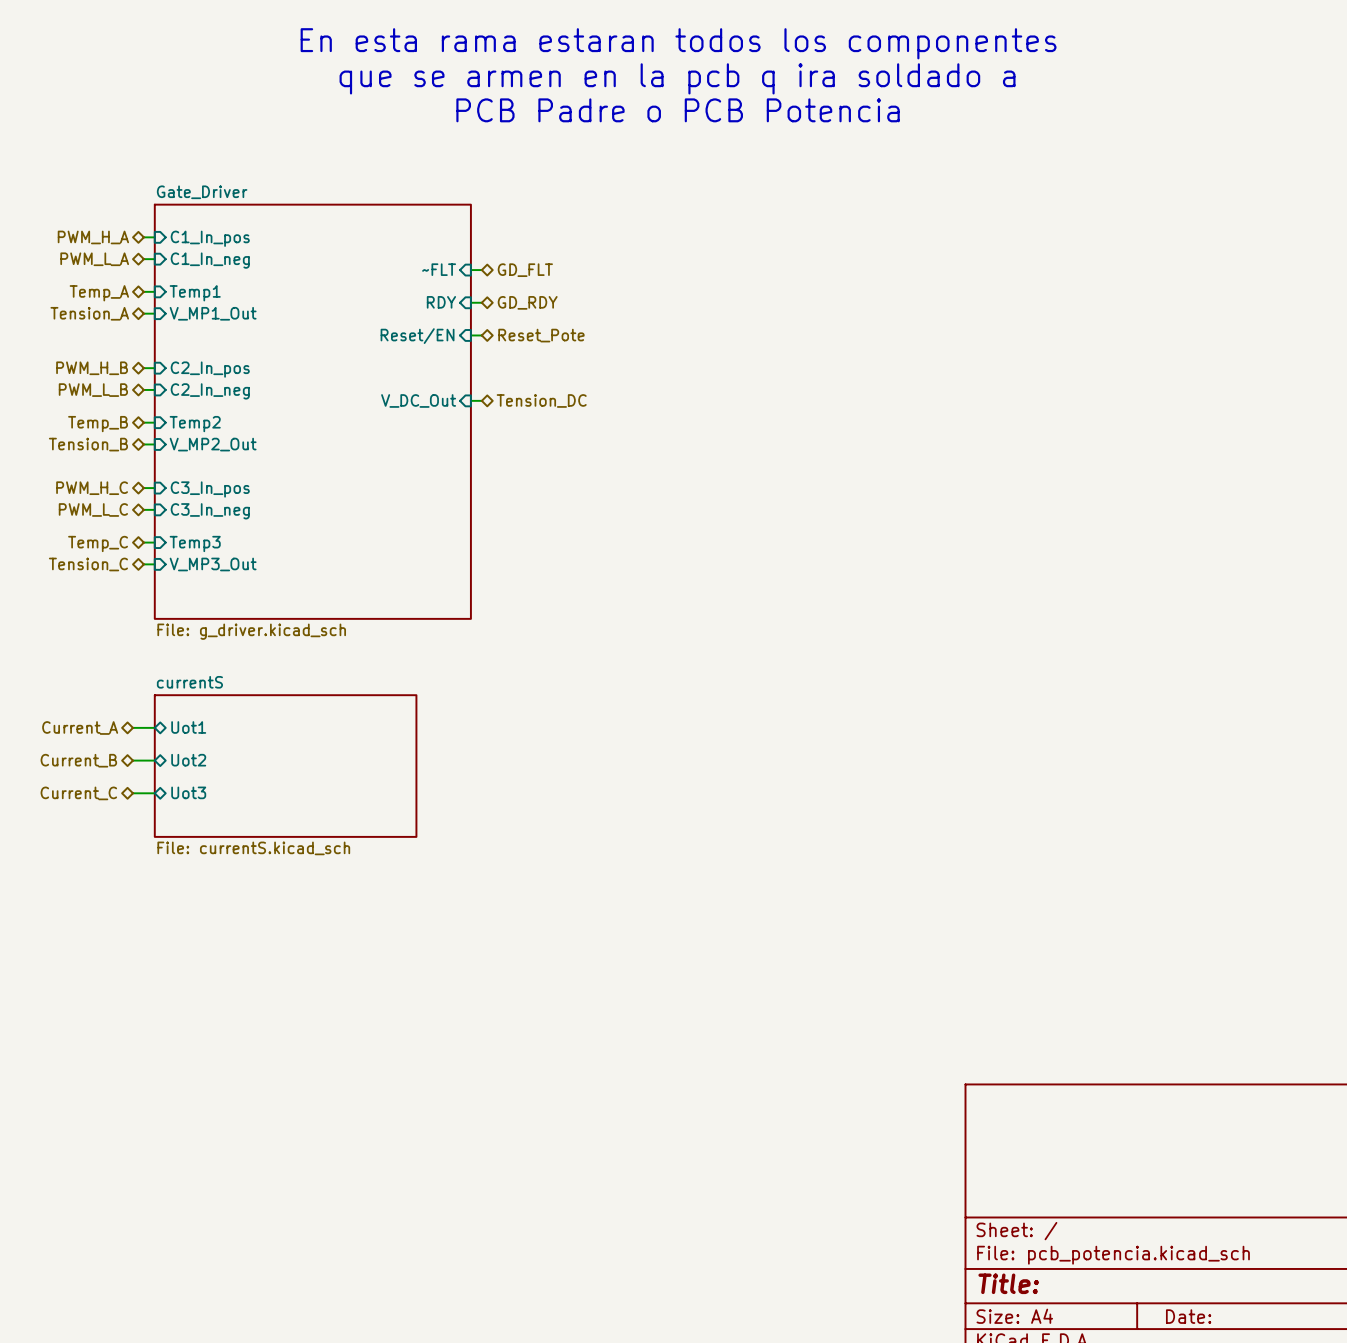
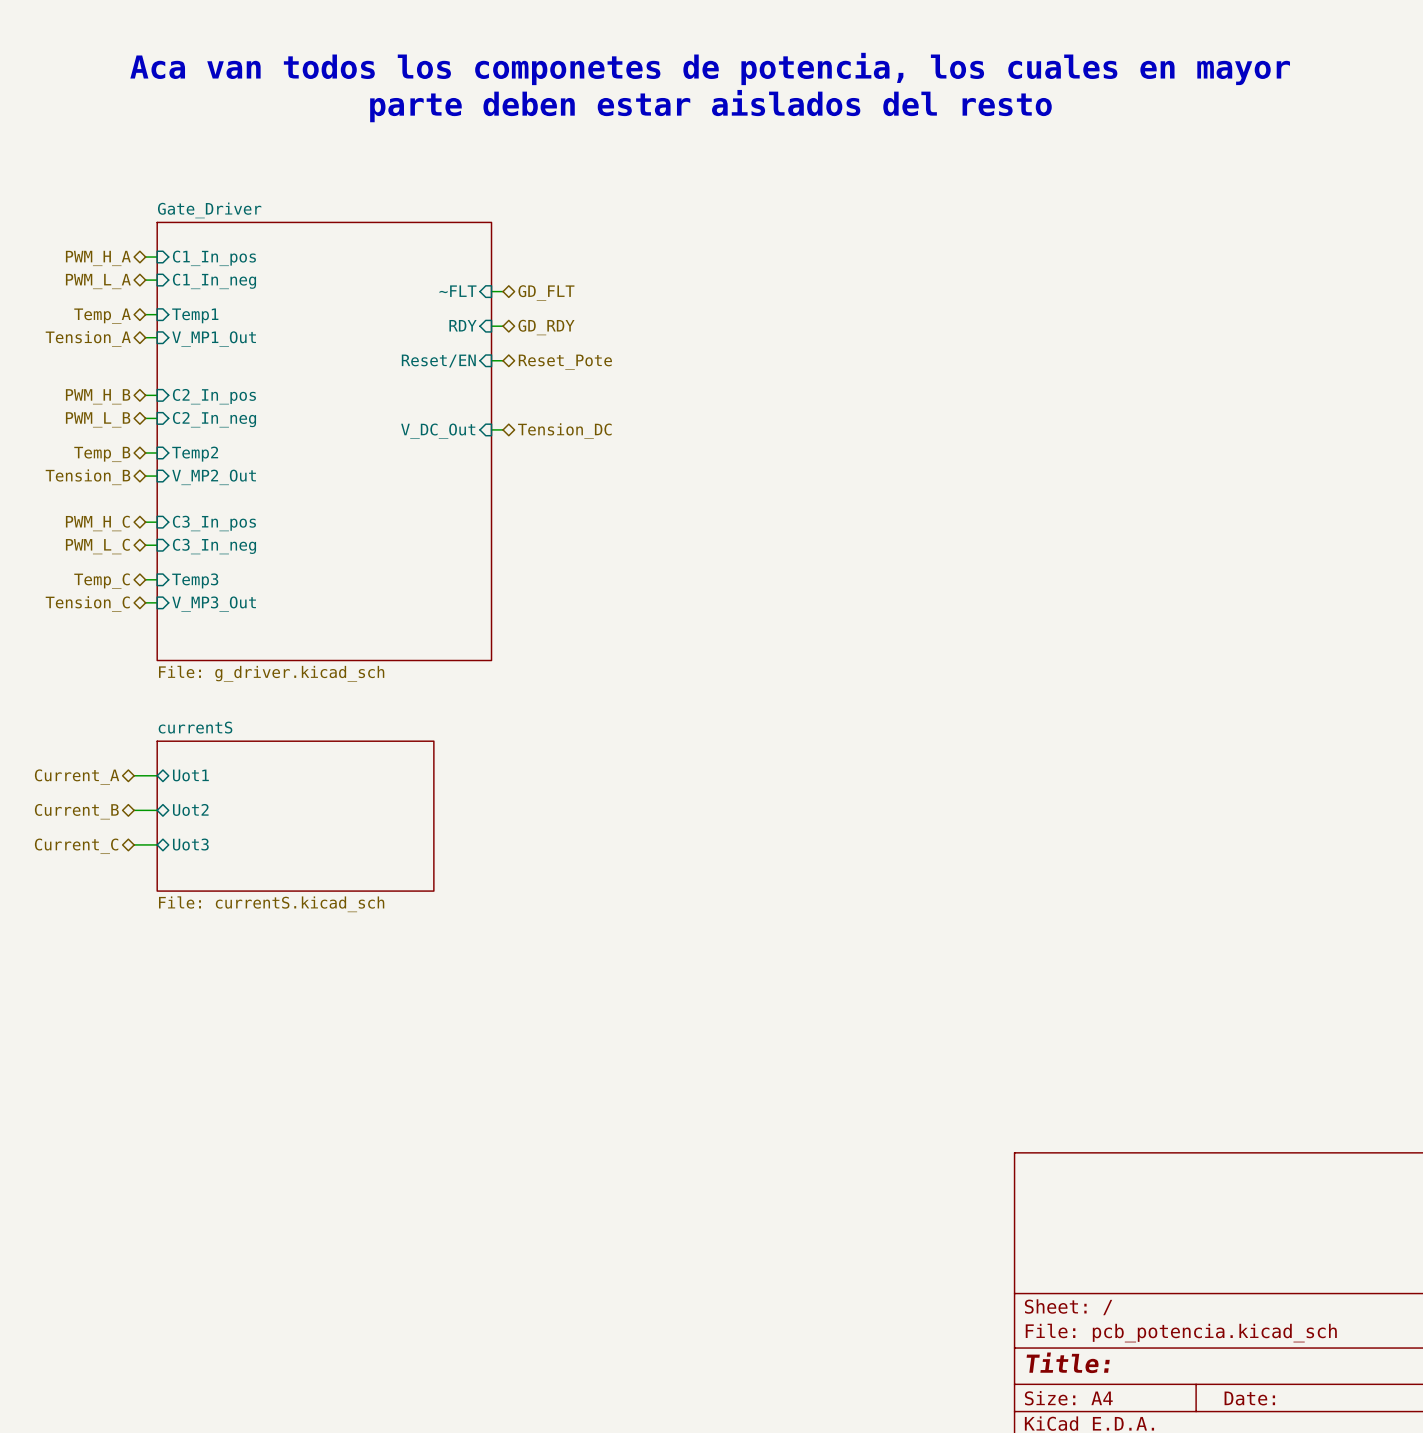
text: En esta rama estaran todos los componentes (678, 43) -> none
text: none -> Aca van todos los componetes de potencia, los cuales en mayor (710, 68)
text: que se armen en la pcb q ira soldado a (677, 78) -> none
text: none -> parte deben estar aislados del resto (710, 106)
text: PCB Padre o PCB Potencia (678, 110) -> none

